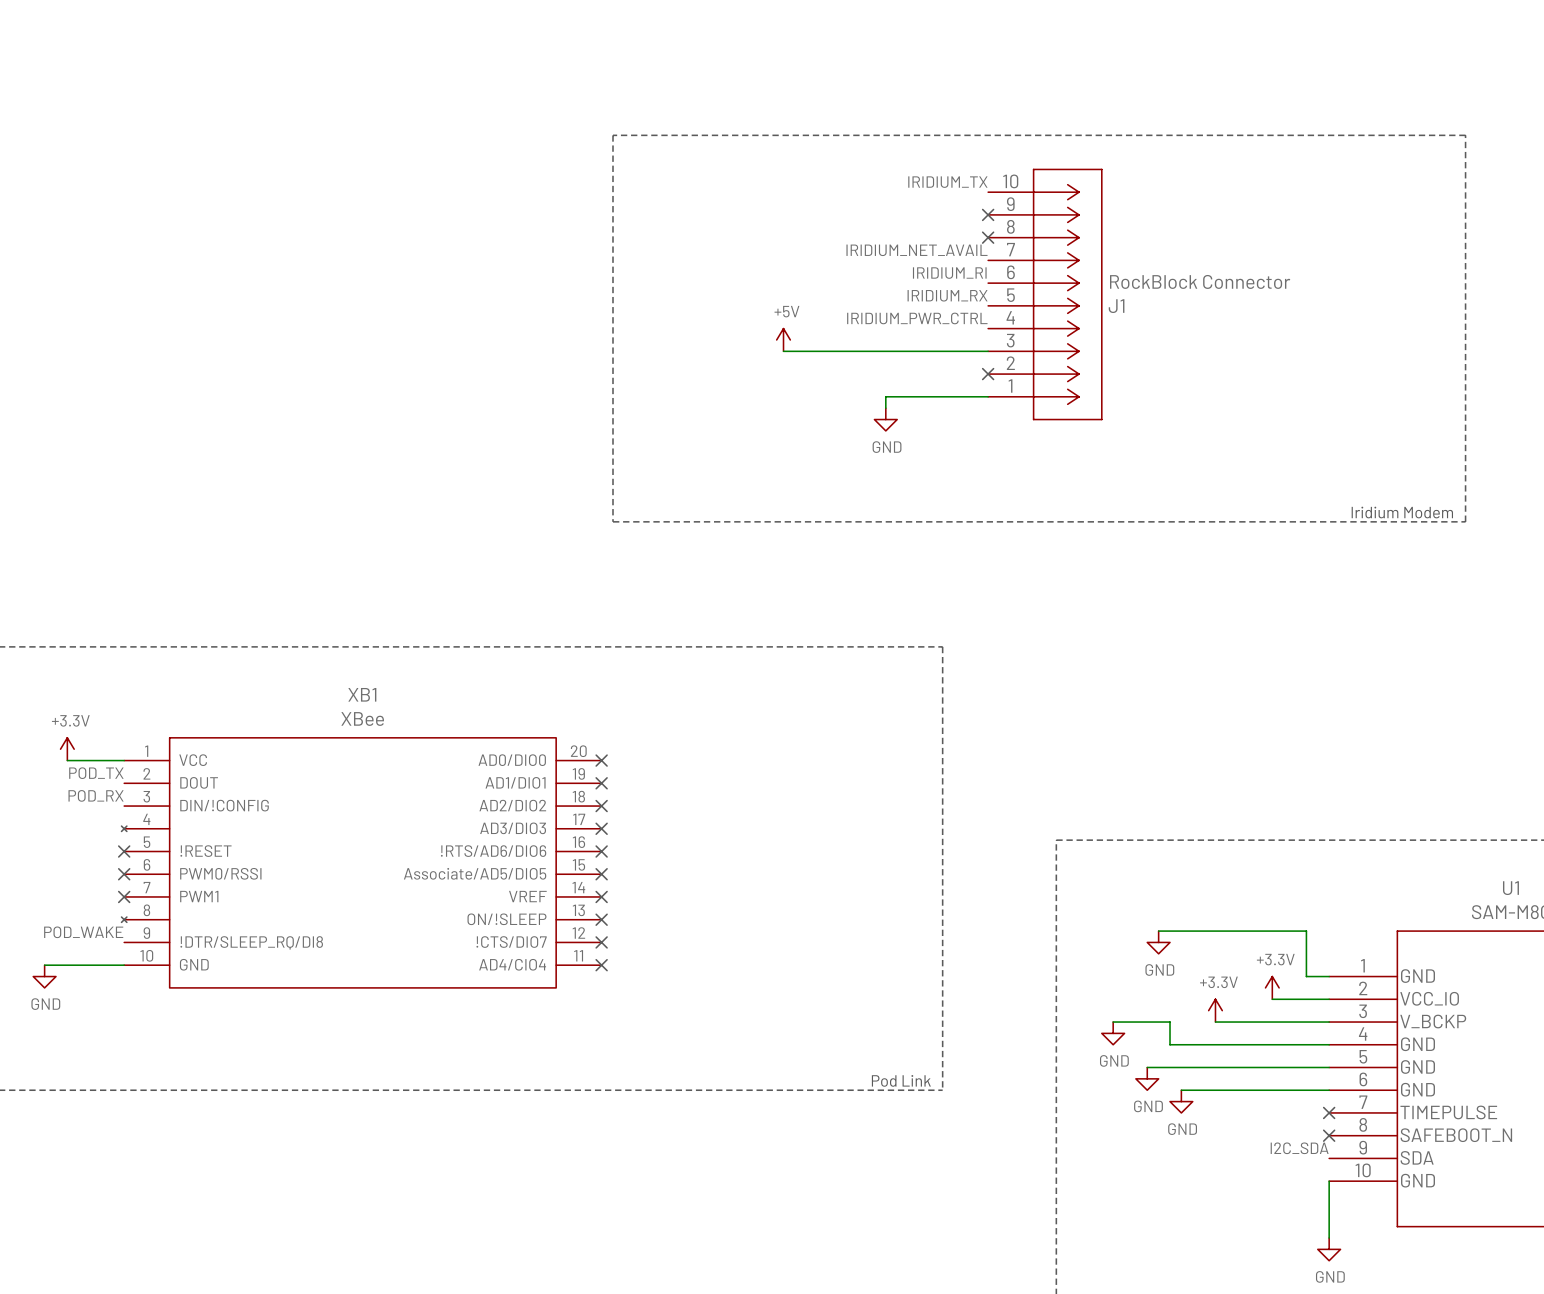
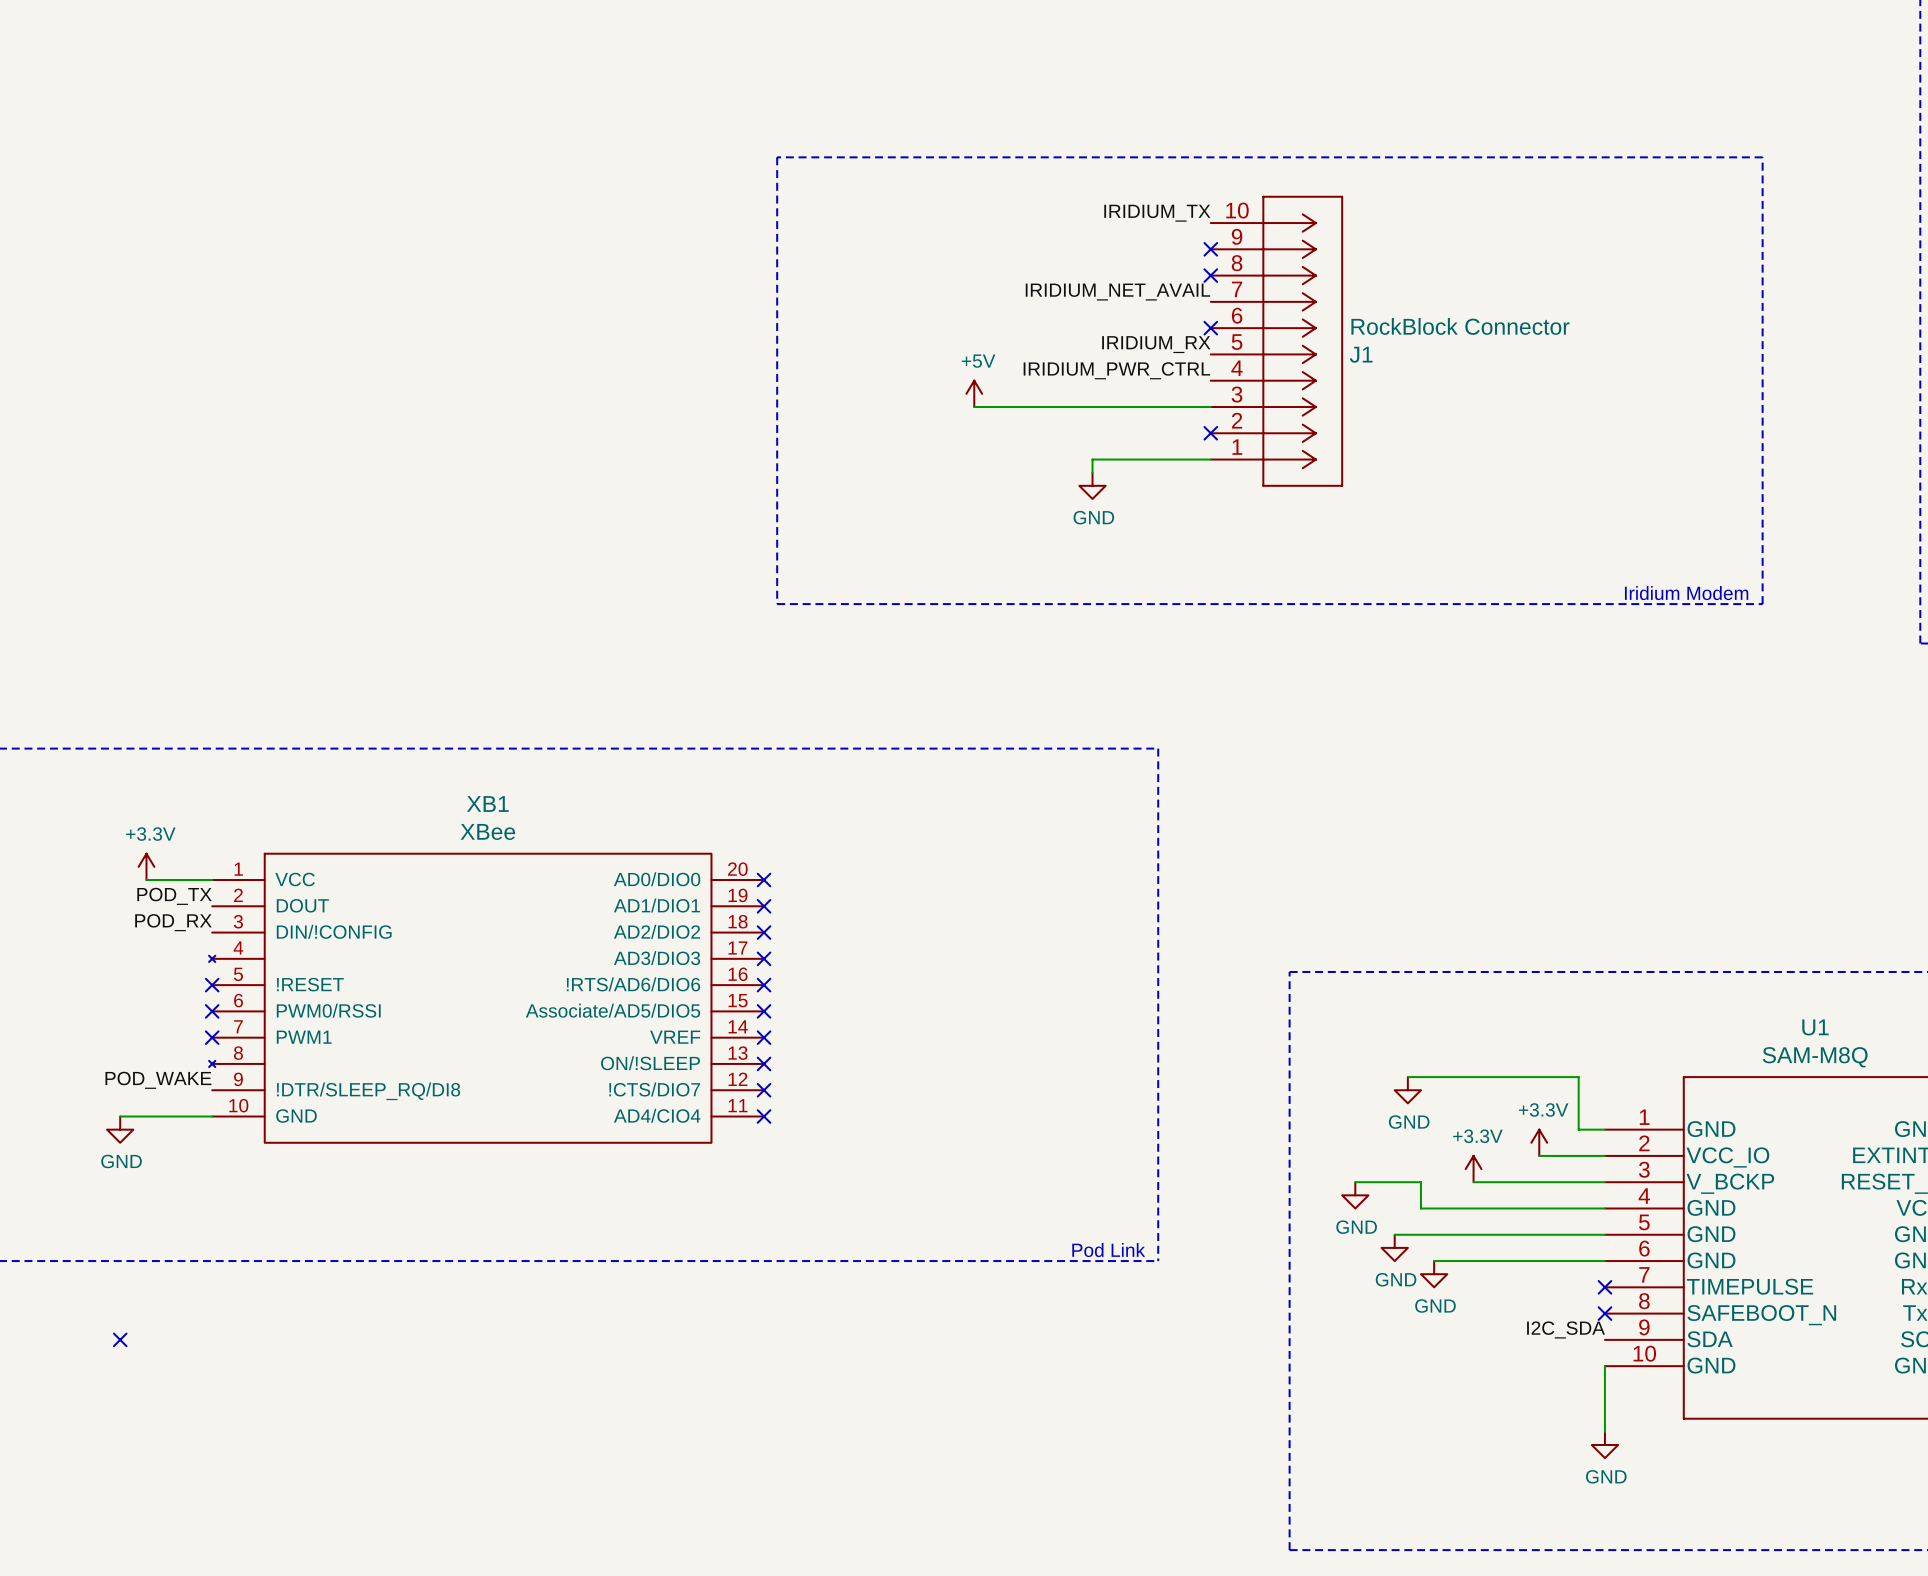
label: IRIDIUM_RI (949, 273) -> none
no-connect mark: none -> (1210, 328)
no-connect mark: none -> (120, 1339)

